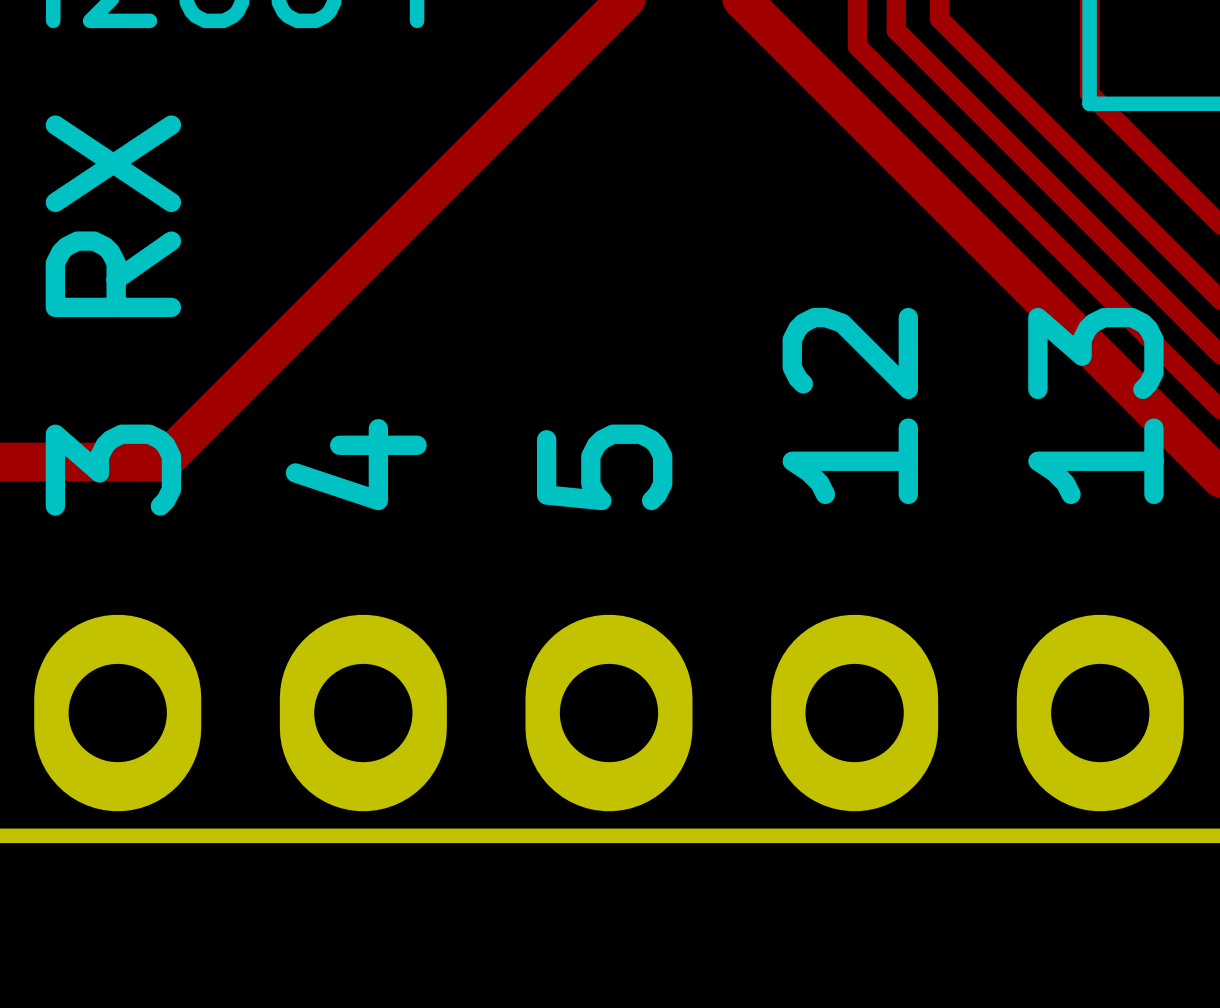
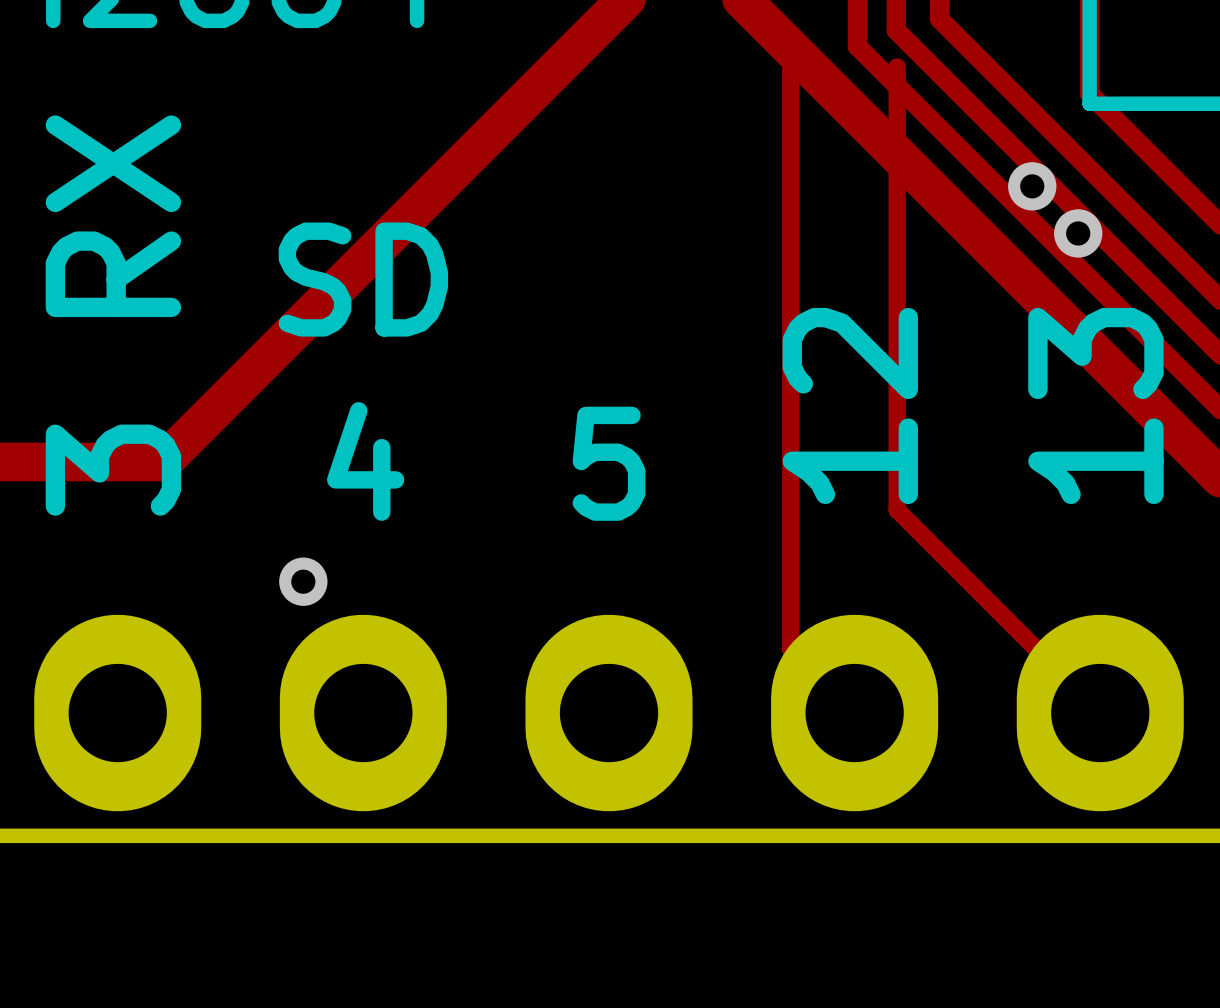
track: none -> (790, 67) (790, 649) (854, 713)
track: none -> (897, 67) (897, 509) (1100, 713)
via: none -> (1032, 186)
via: none -> (1078, 233)
text: none -> SD (363, 279)
text rotation: 0° (356, 464) -> 90° clockwise (365, 461)
text rotation: 0° (604, 467) -> 90° clockwise (608, 463)
via: none -> (303, 581)

